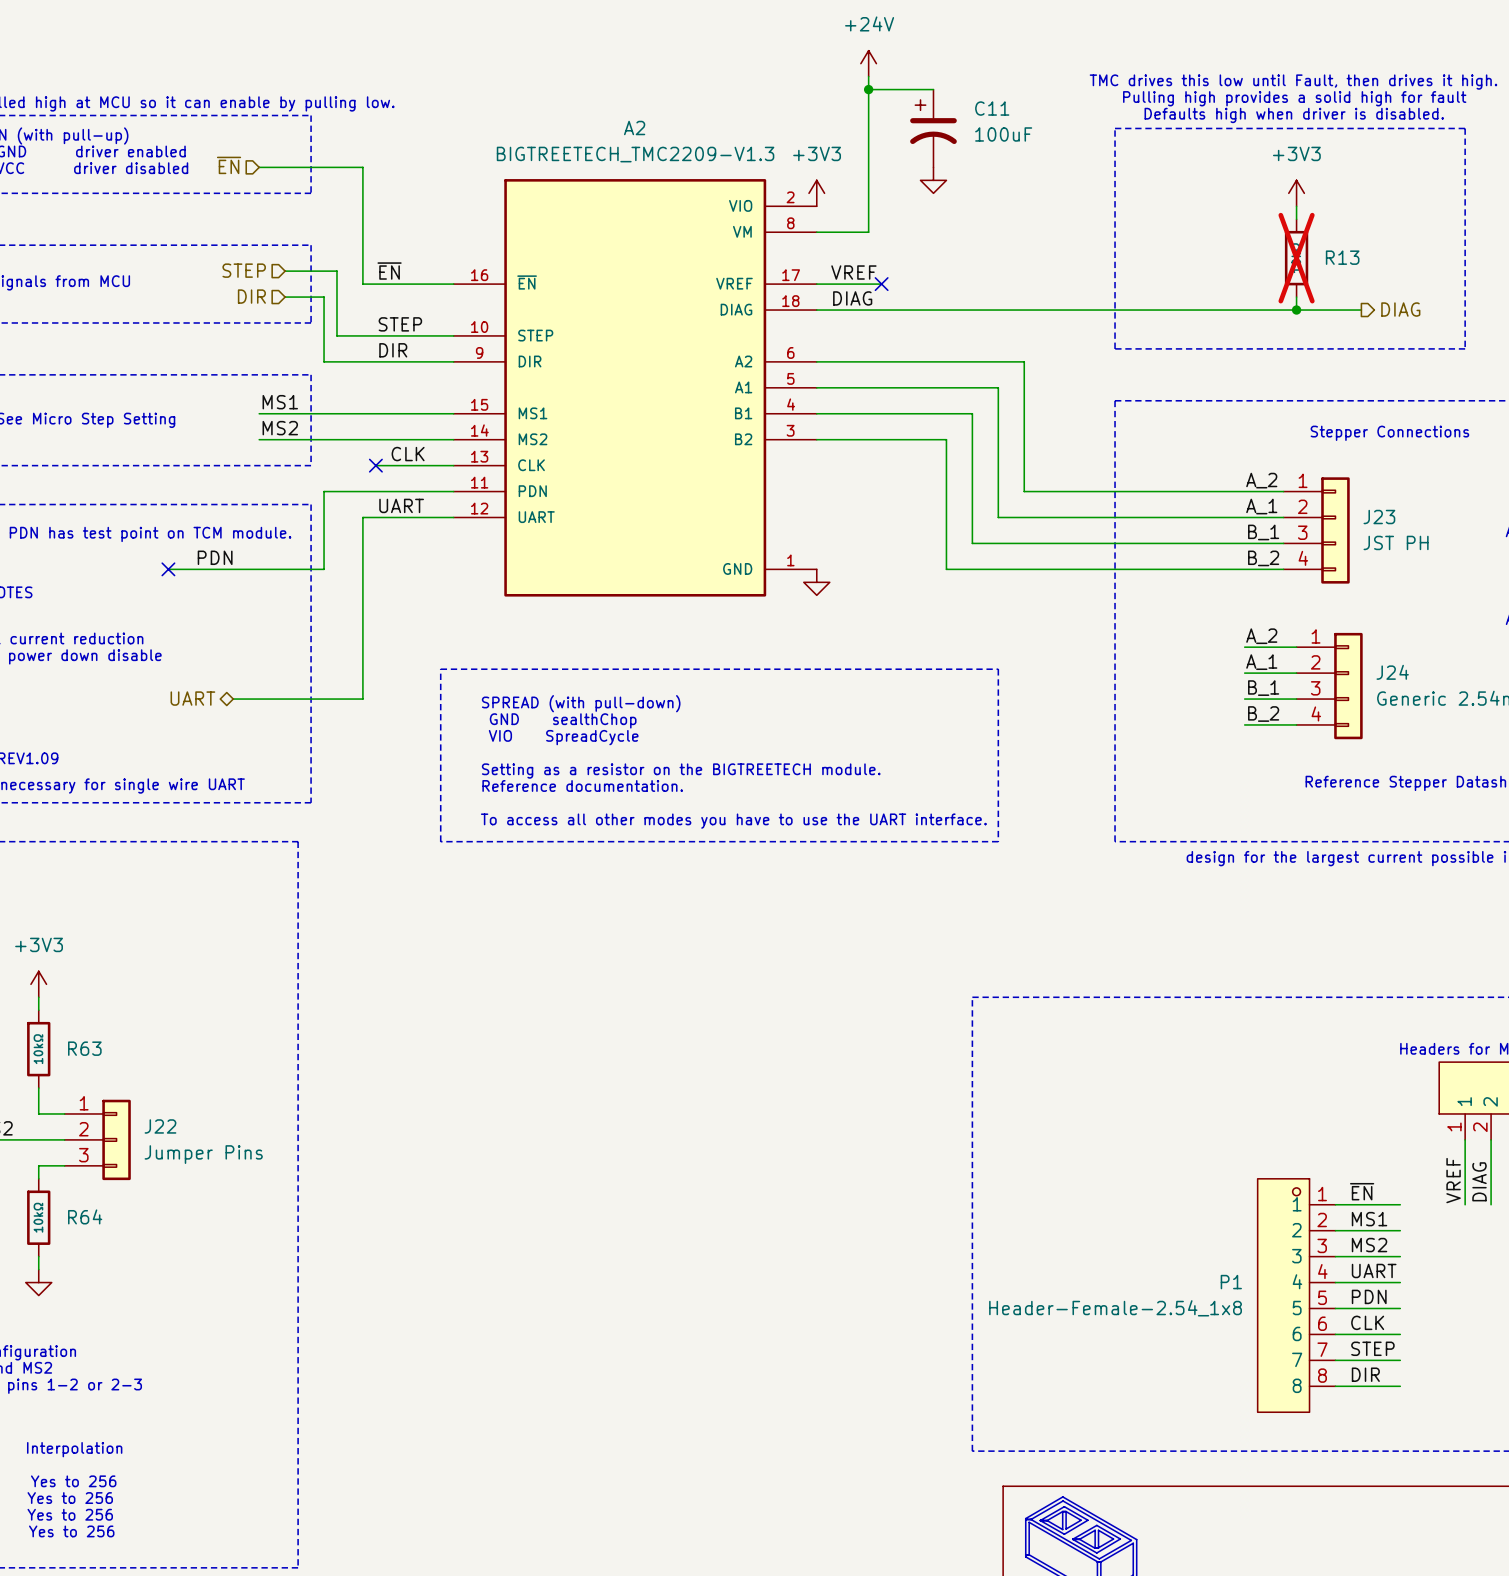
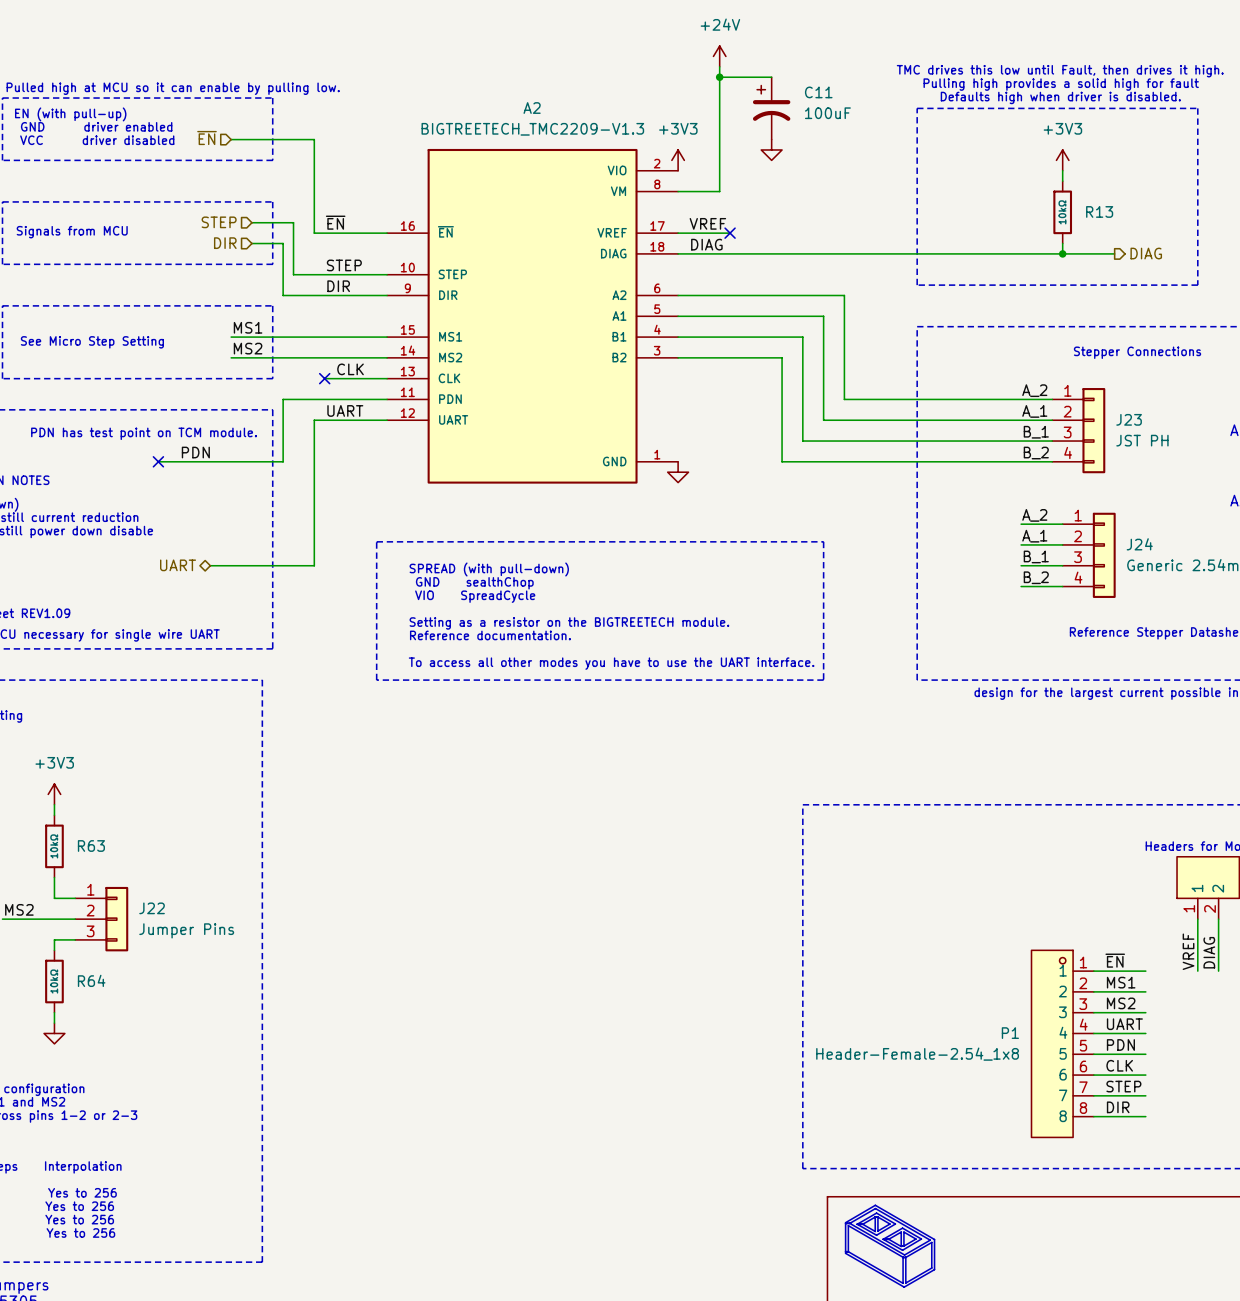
R13 do-not-place cross: (1296, 258) -> none

